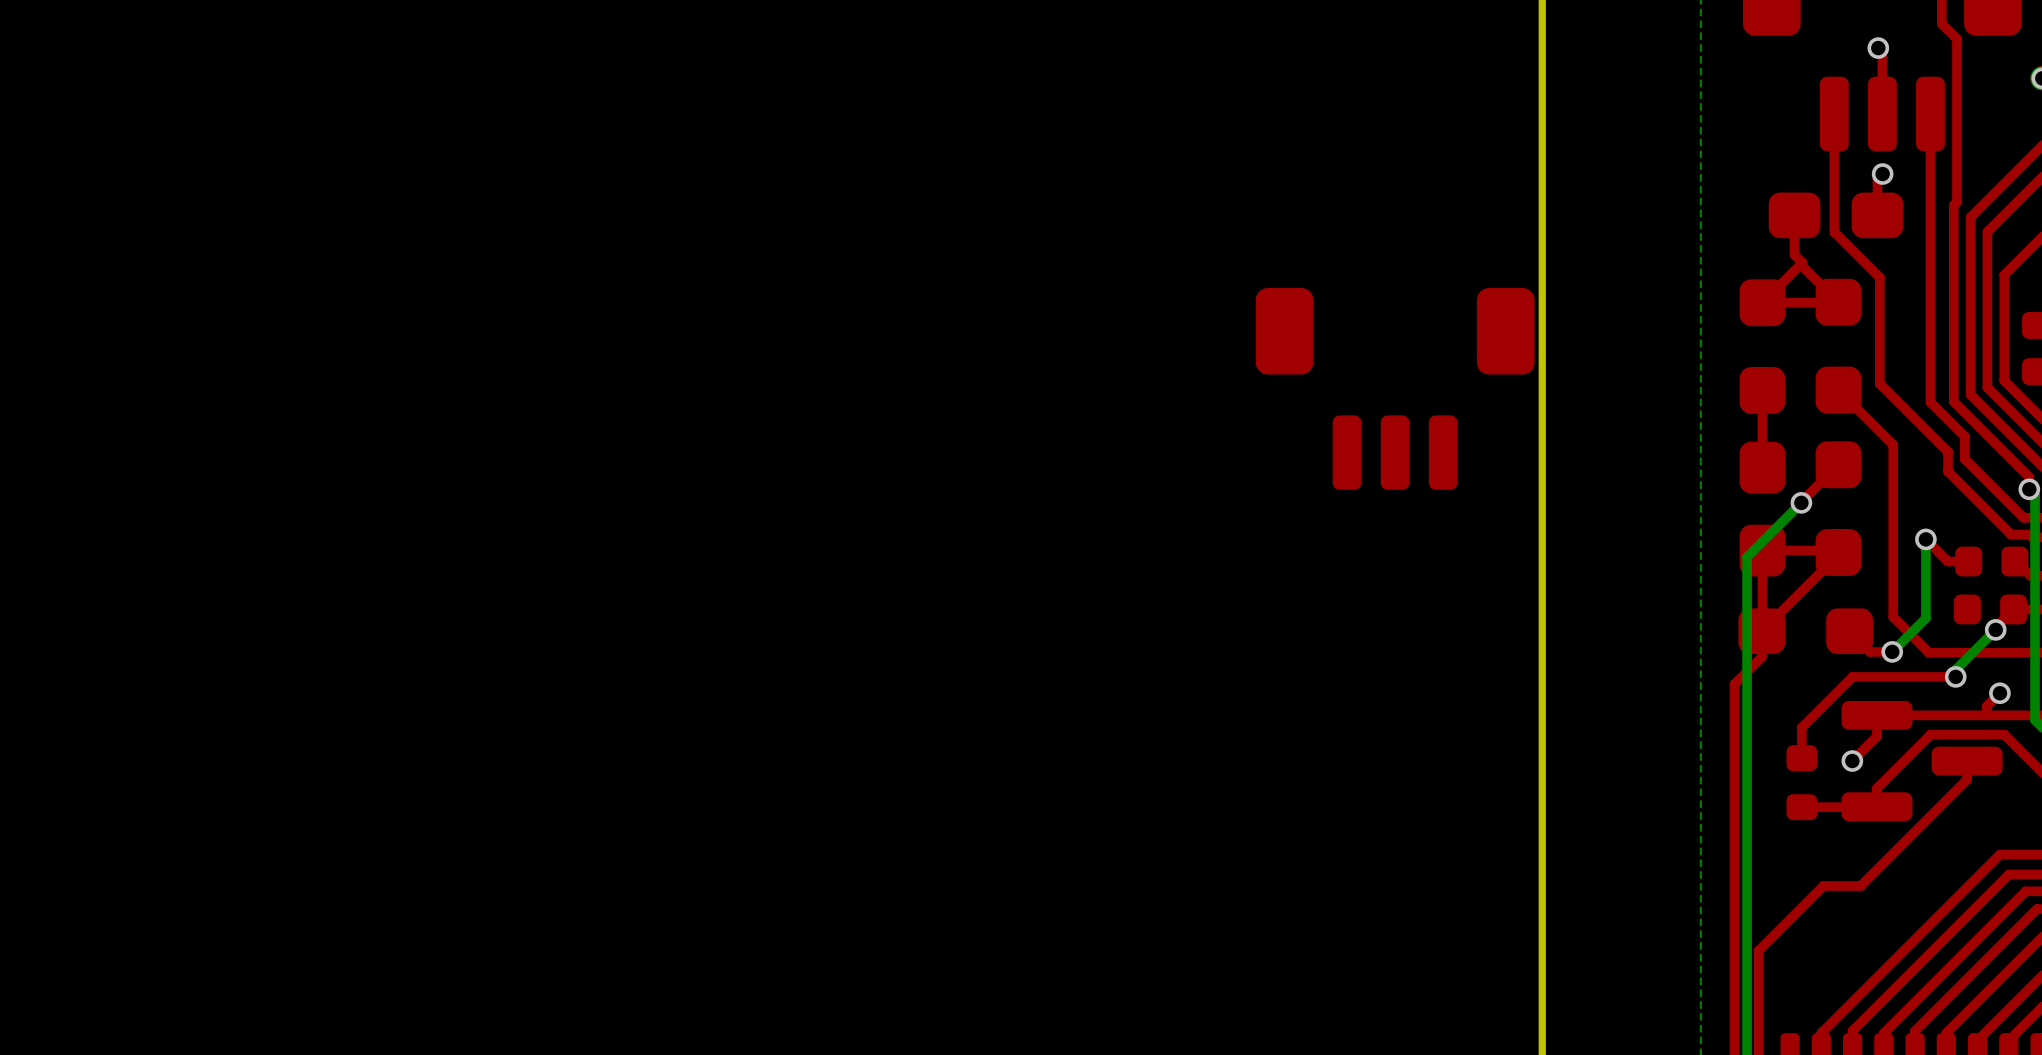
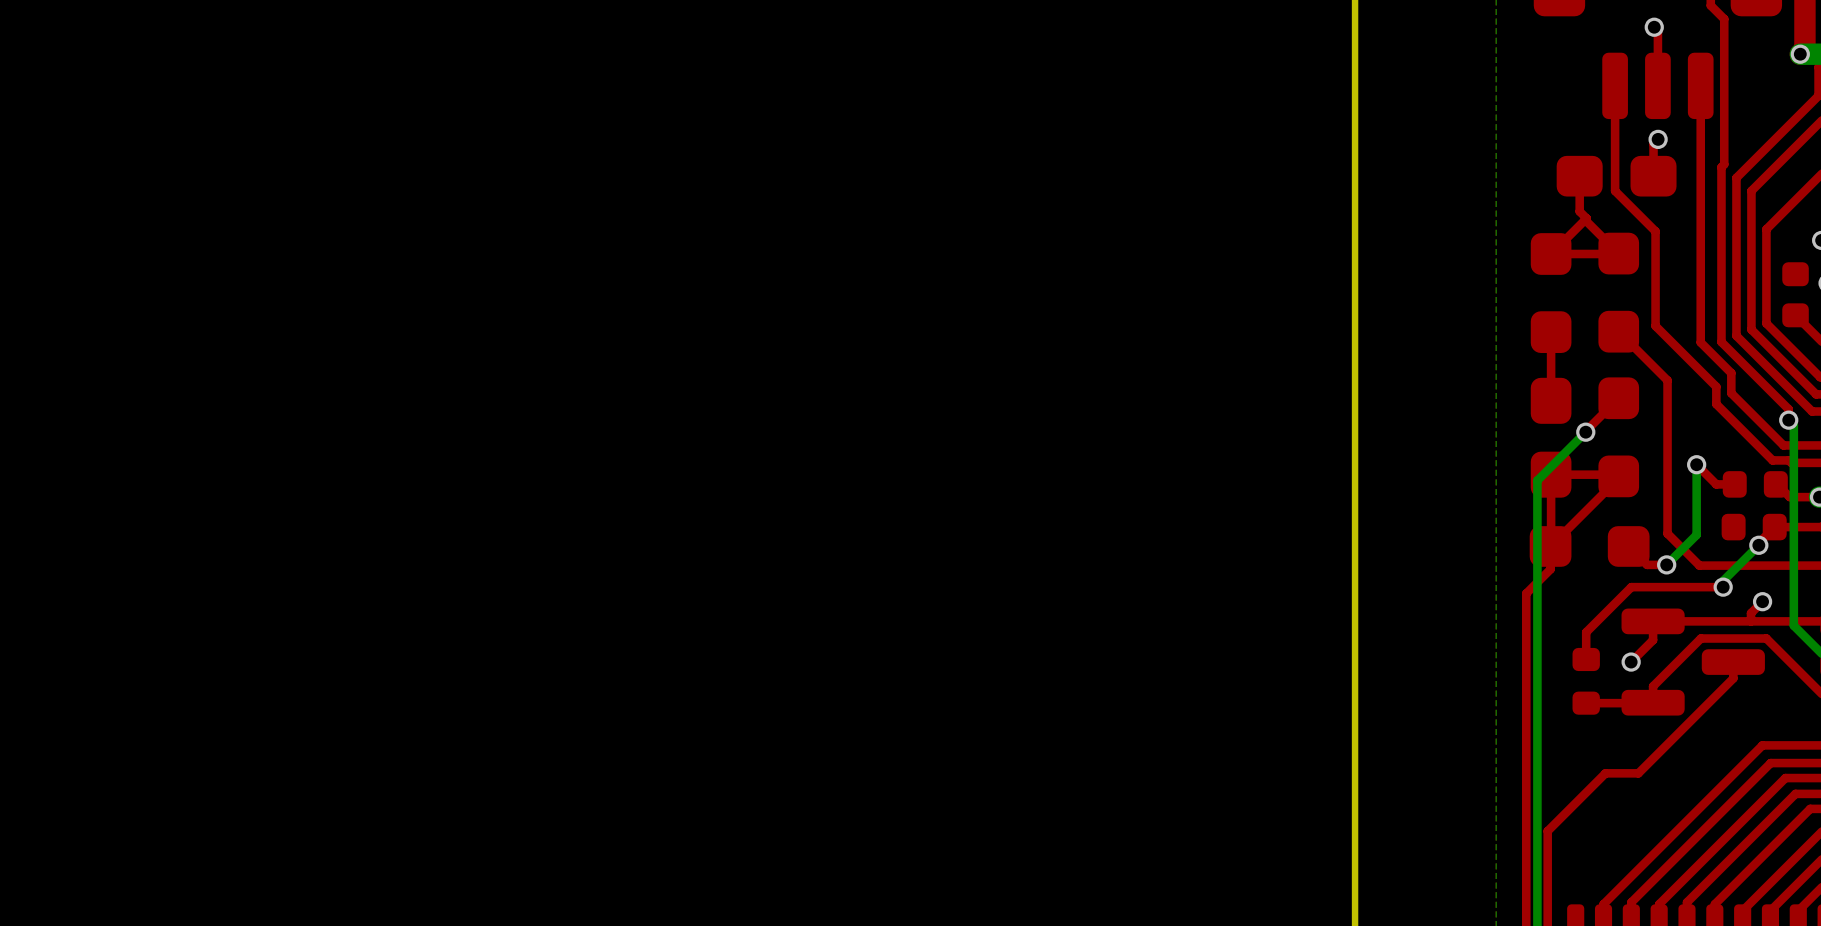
part: (1395, 388) -> none

